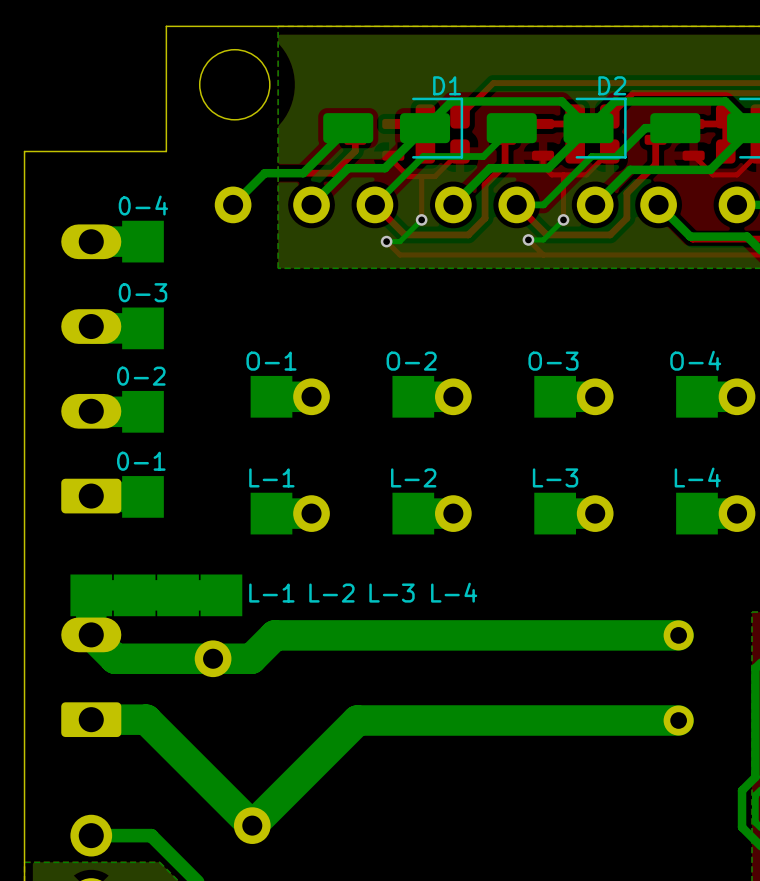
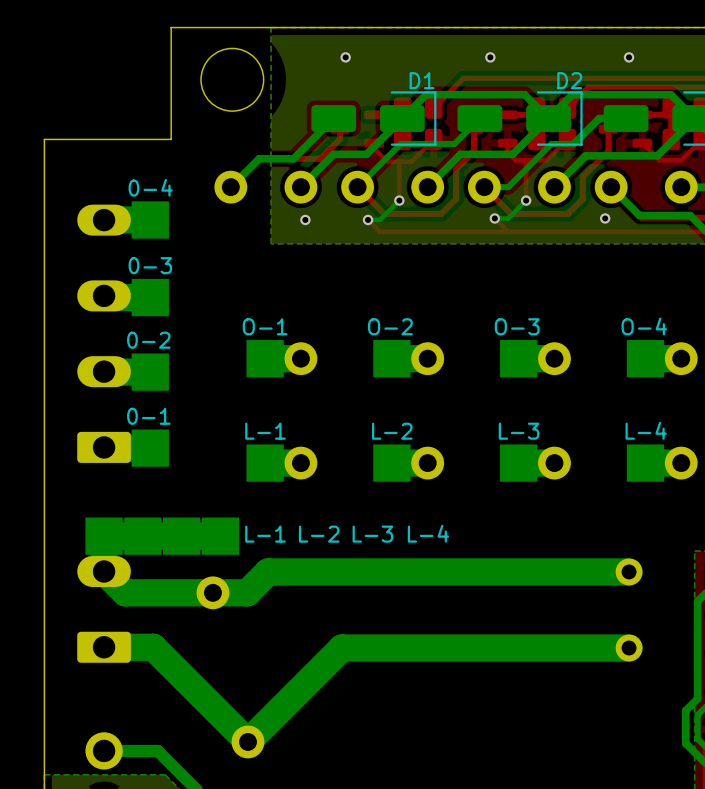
via: none -> (345, 57)
via: none -> (490, 57)
via: none -> (629, 57)
via: none -> (605, 218)
via: none -> (305, 219)

